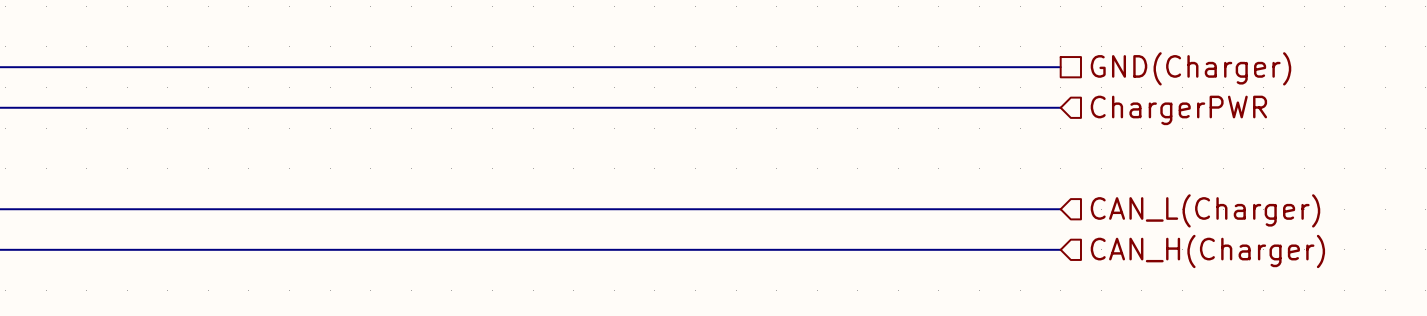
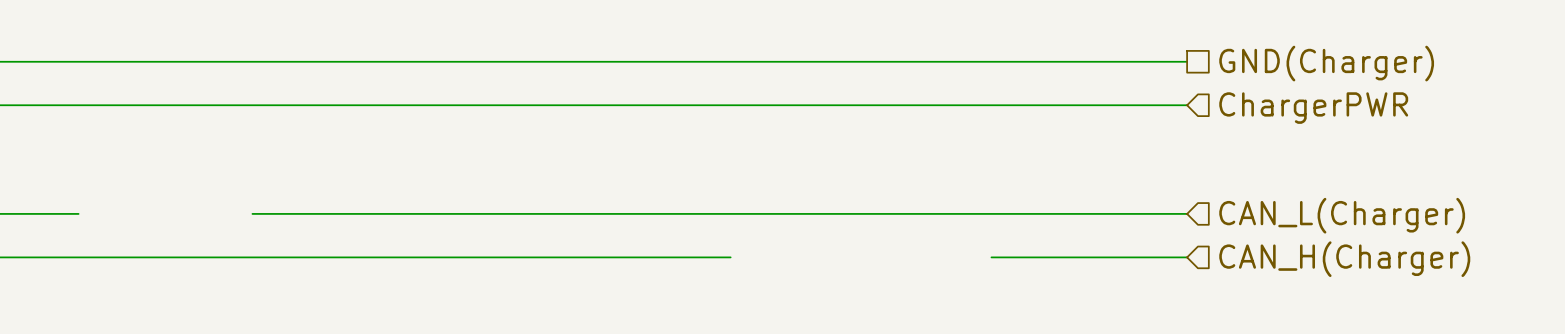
wire: (25, 209) (188, 209) -> none
wire: (634, 249) (878, 249) -> none

